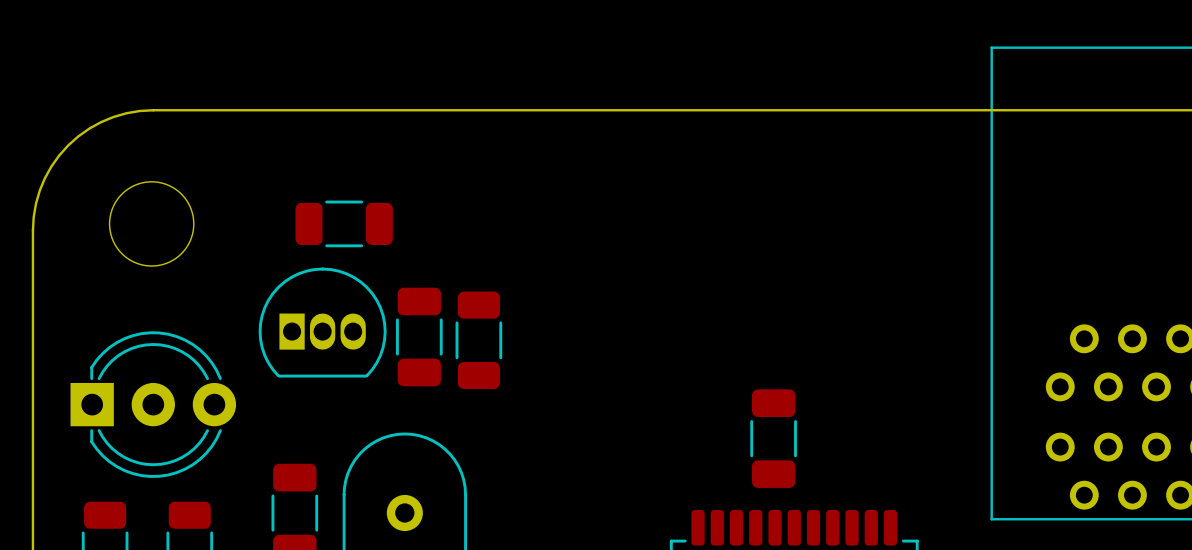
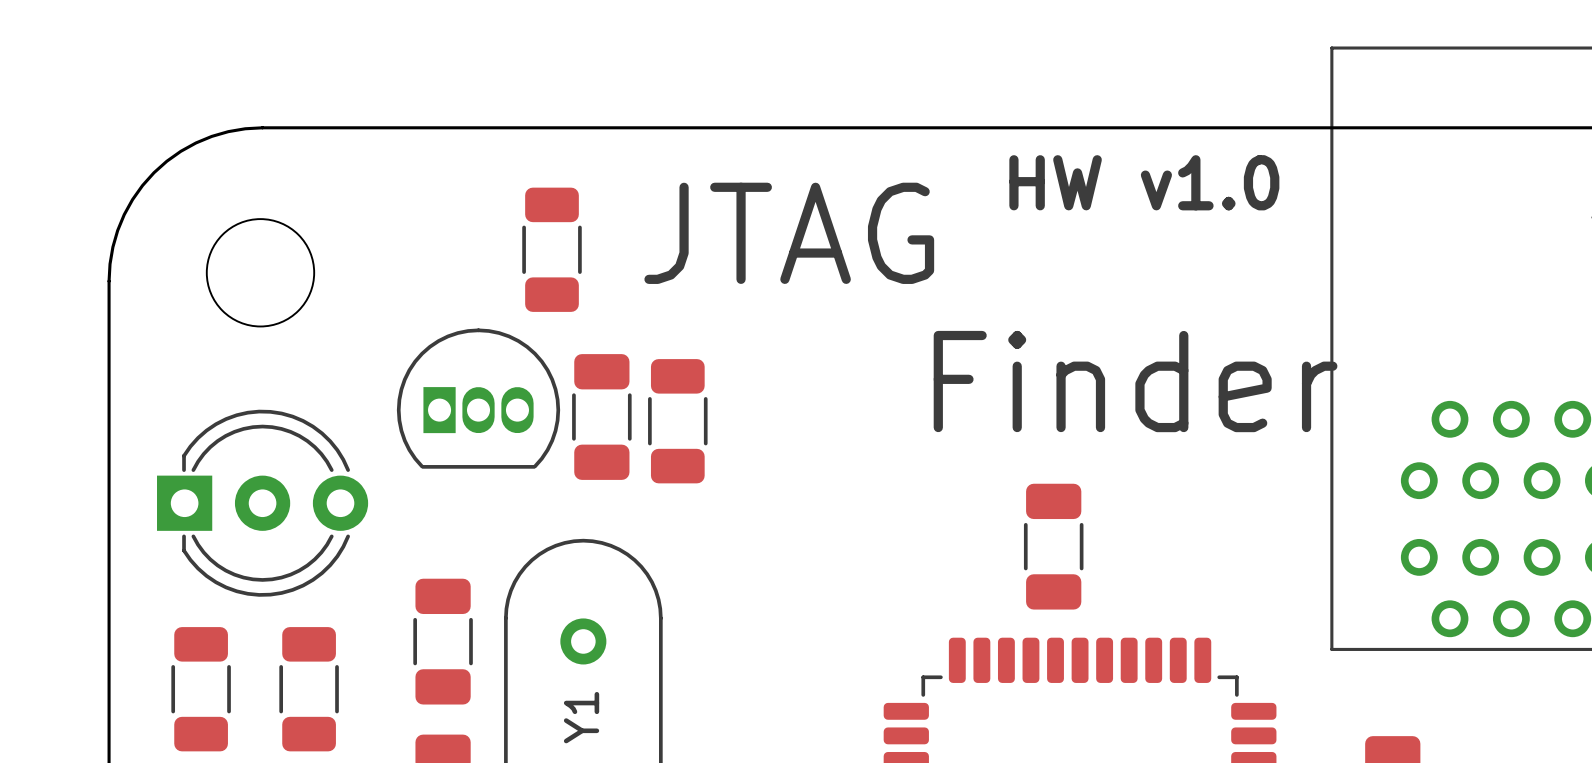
text: none -> HW v1.0 (1144, 182)
text: none -> JTAG (789, 233)
part rotation: 0° (344, 223) -> 90° clockwise (552, 249)
text: none -> Finder (1135, 381)

